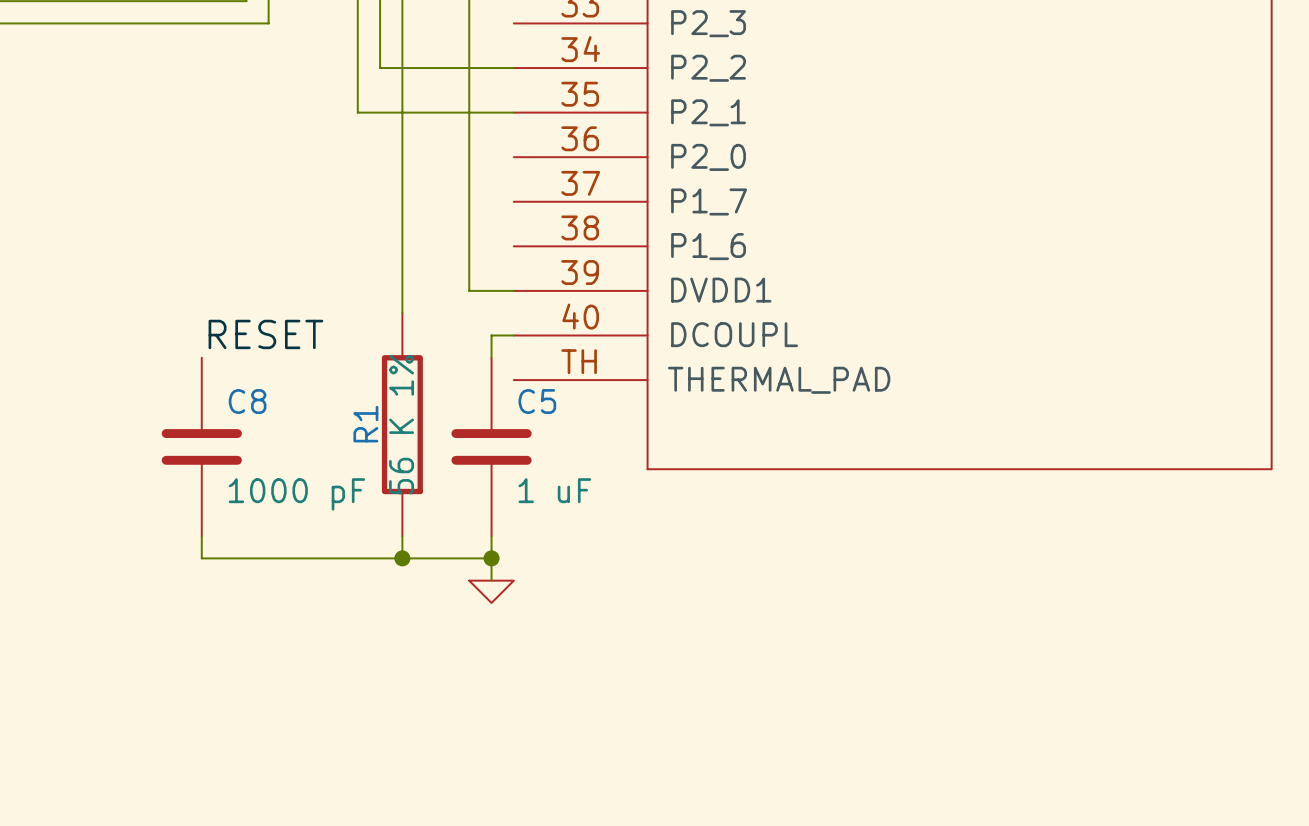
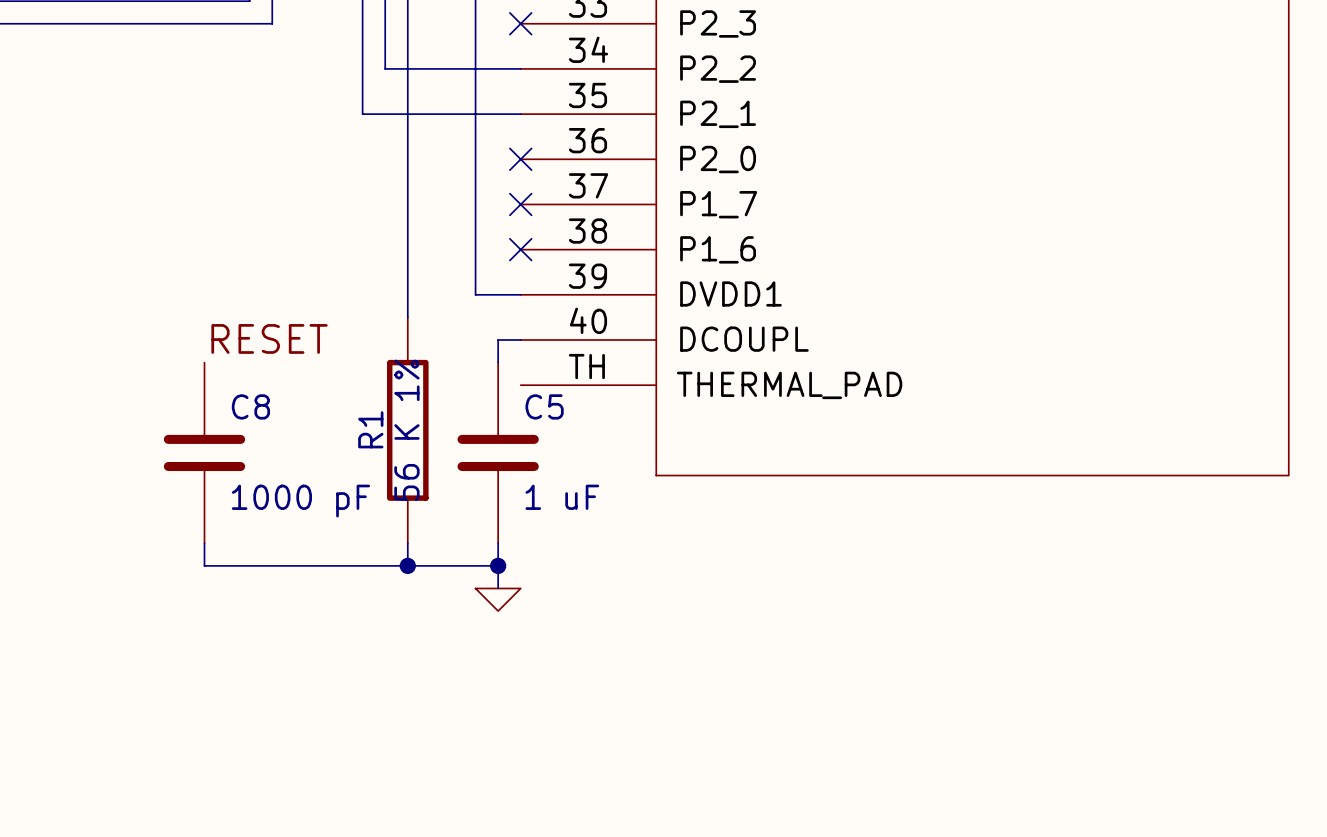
no-connect mark: none -> (520, 23)
no-connect mark: none -> (520, 159)
no-connect mark: none -> (520, 204)
no-connect mark: none -> (520, 249)

